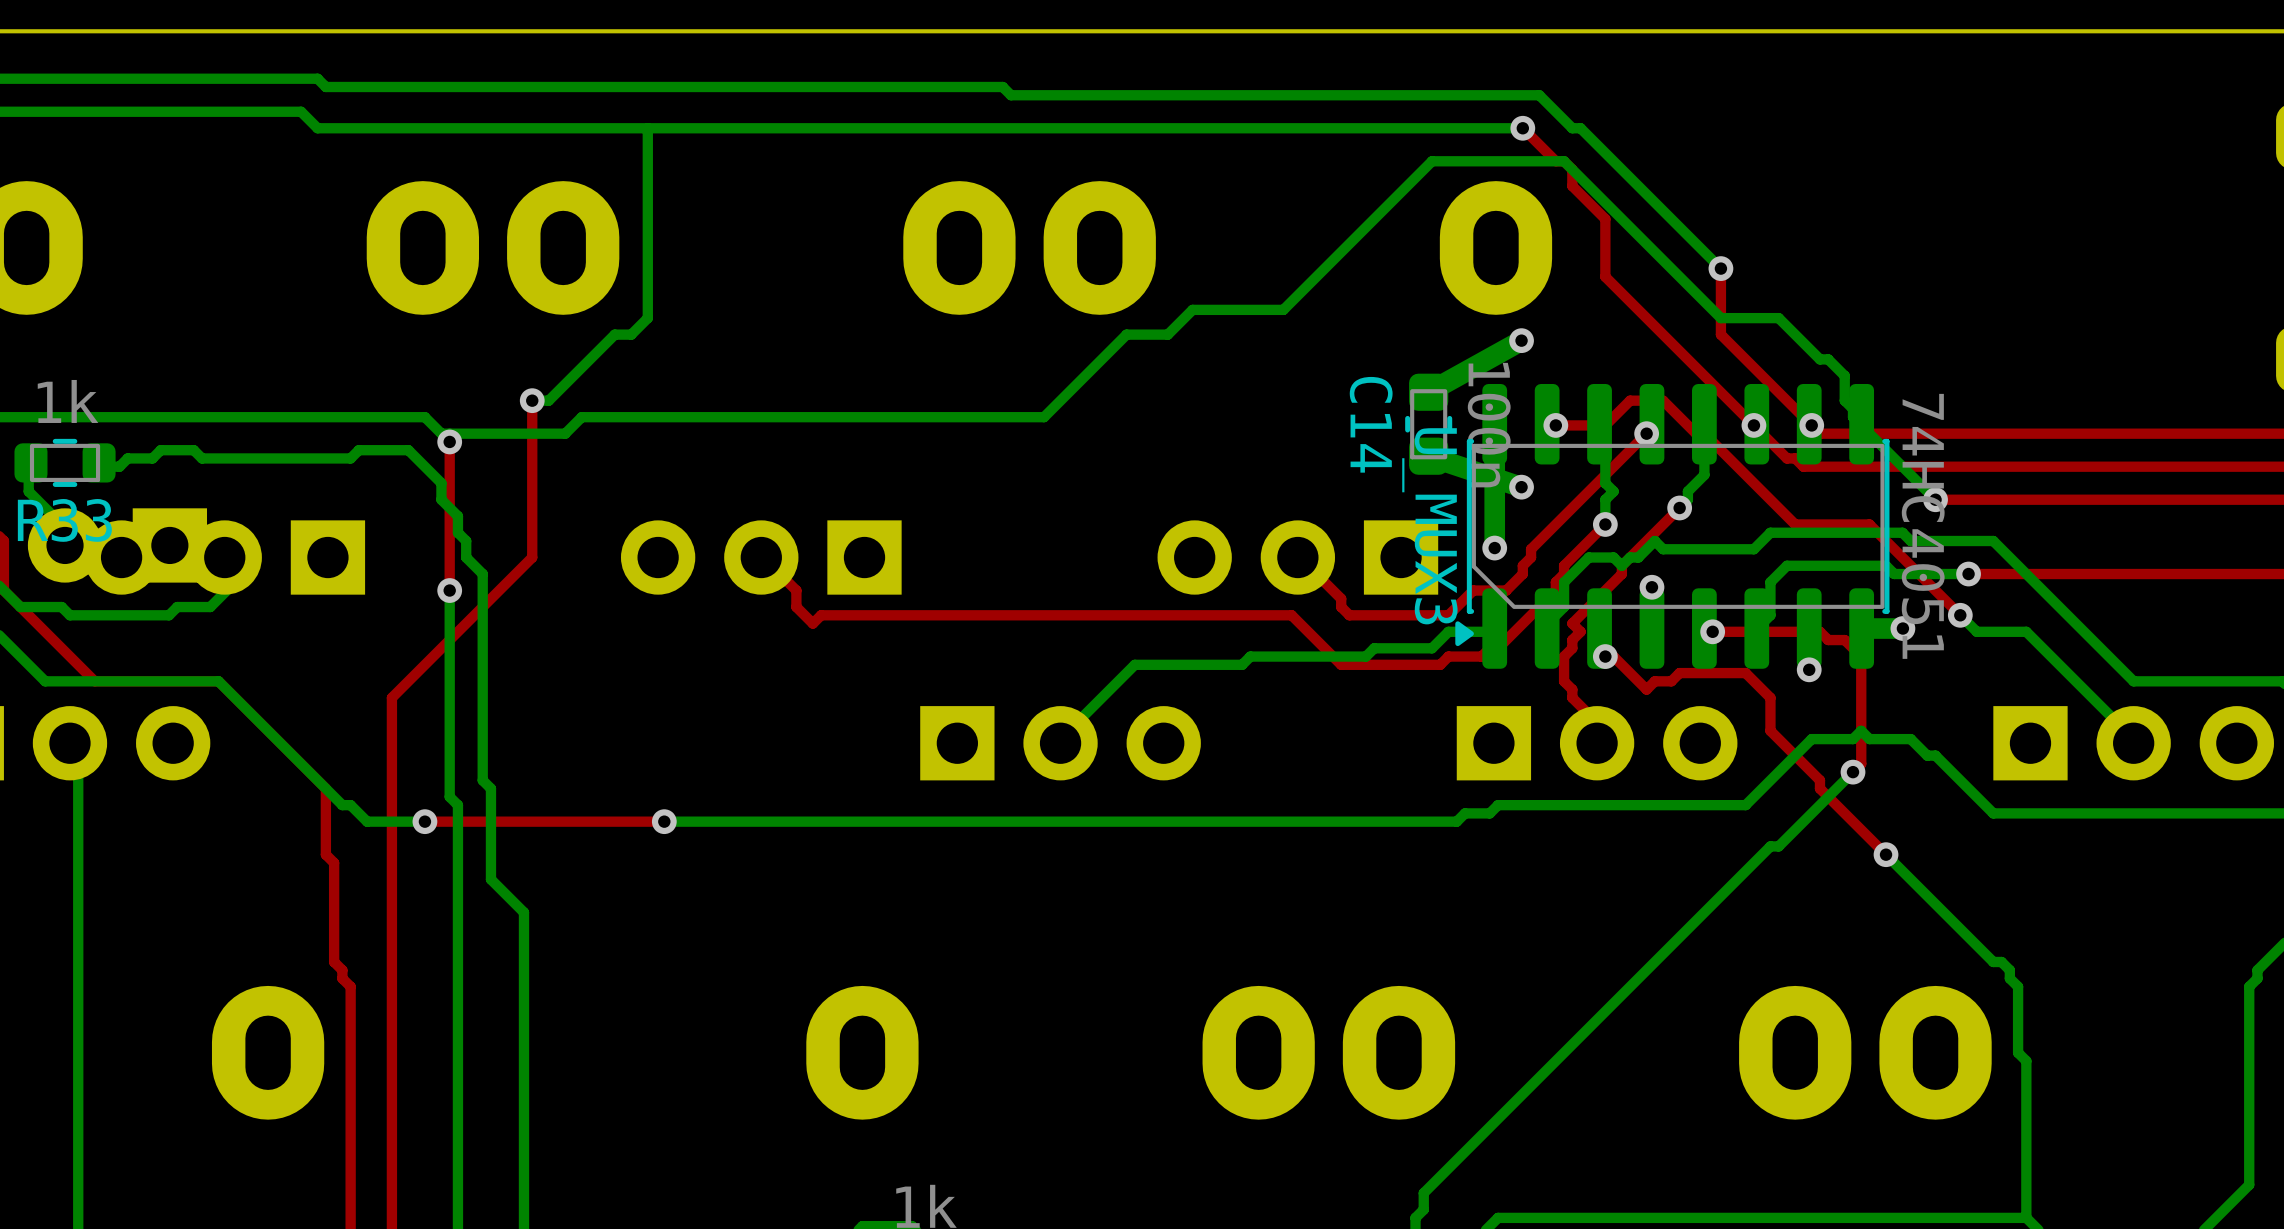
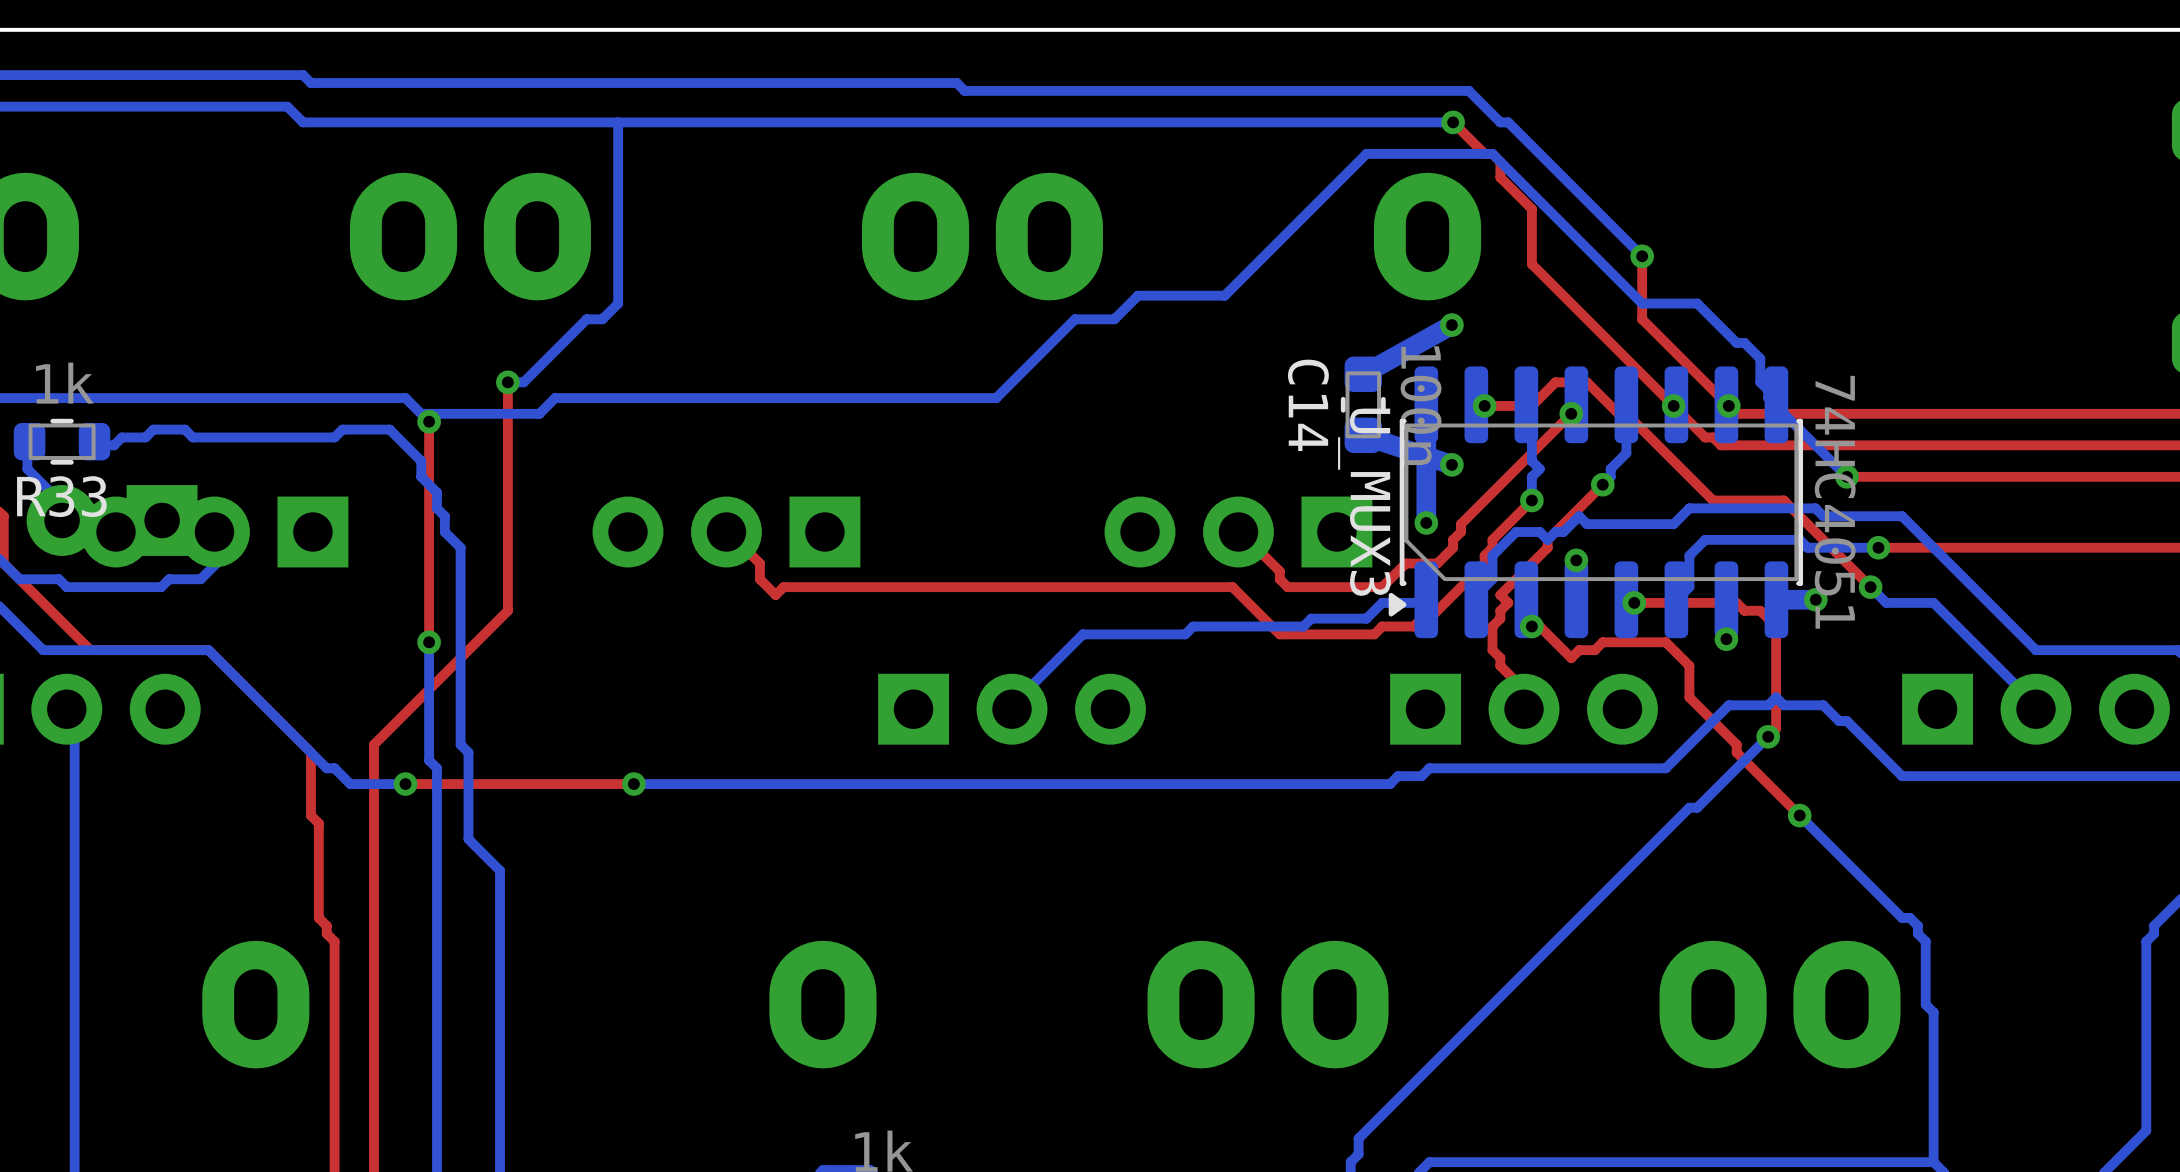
top track: (532, 557) (391, 697) (391, 780) -> (507, 531) (507, 610) (373, 744)
bottom track: (449, 590) (449, 673) -> none
top track: none -> (429, 563) (429, 642)
via position: (449, 590) -> (429, 642)

